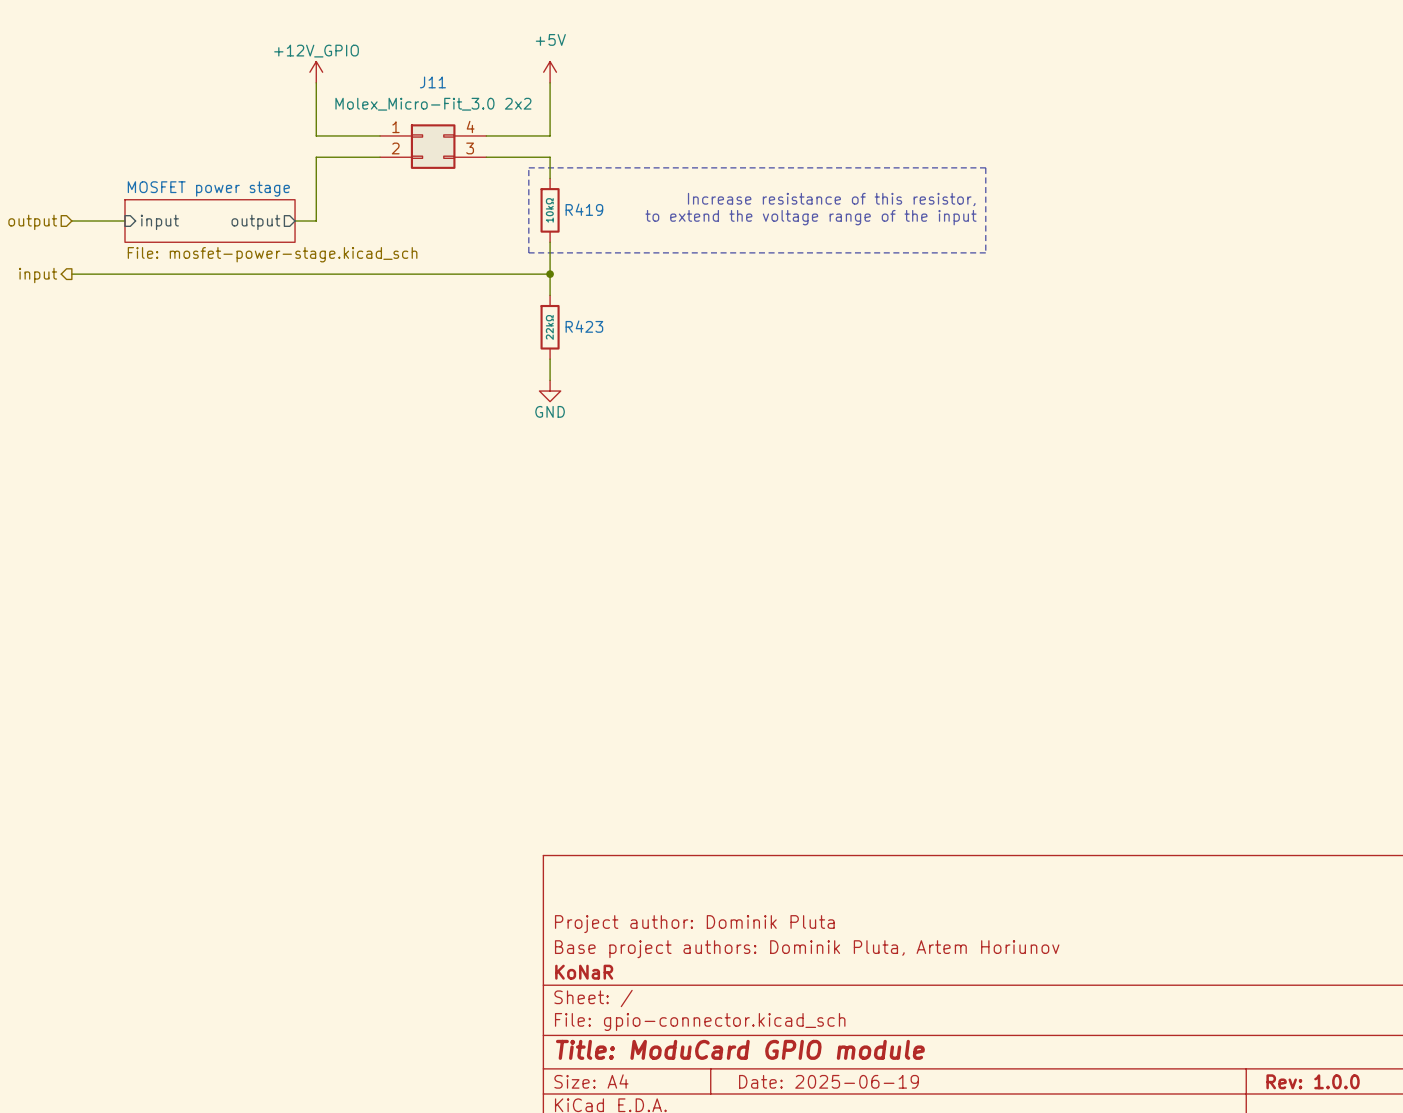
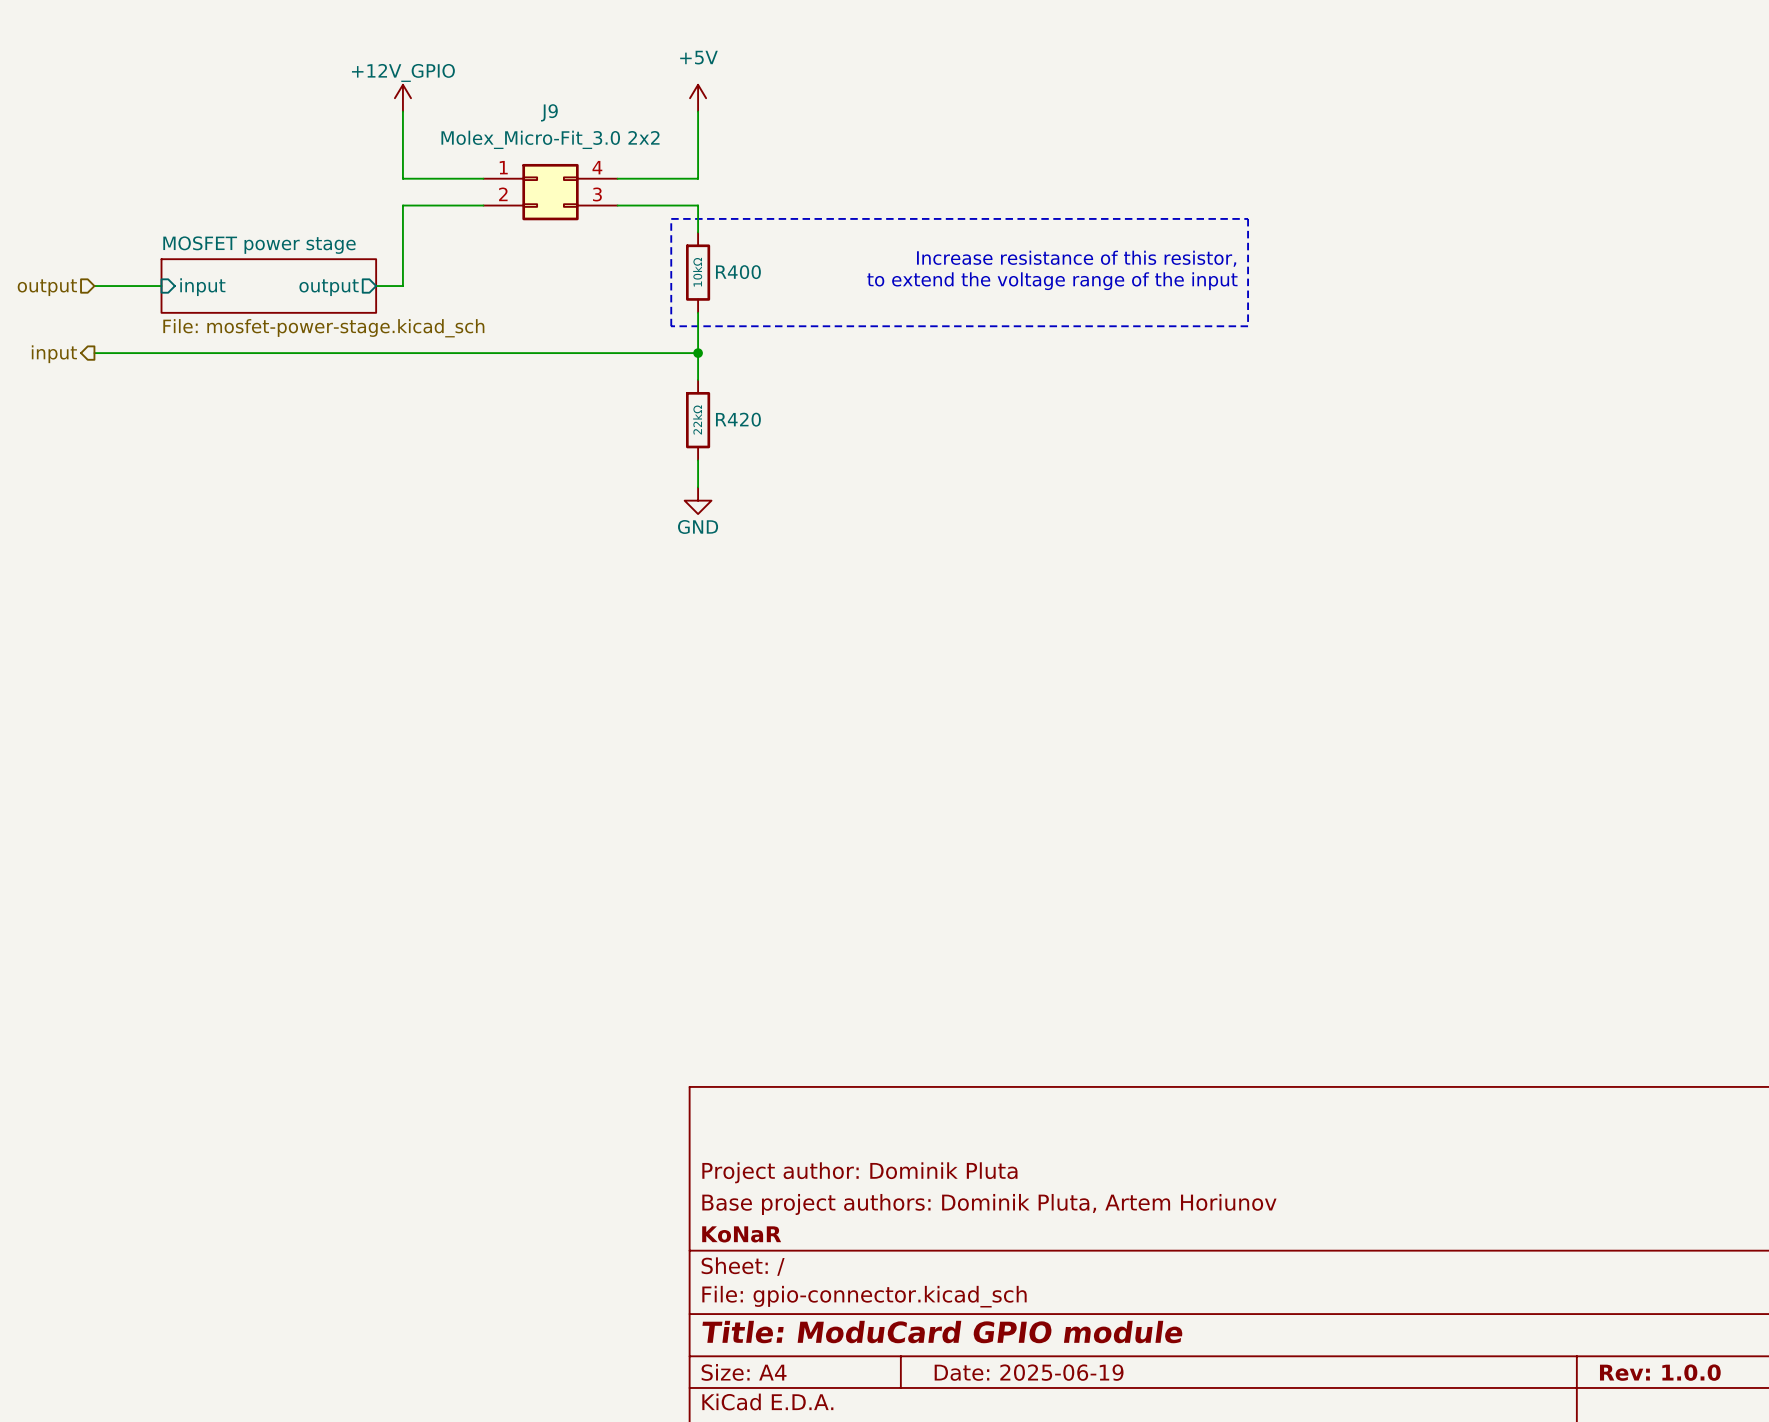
J11 name: J11 (432, 82) -> J9 (549, 112)
R419 name: R419 (584, 209) -> R400 (738, 272)
R423 name: R423 (584, 326) -> R420 (738, 419)

